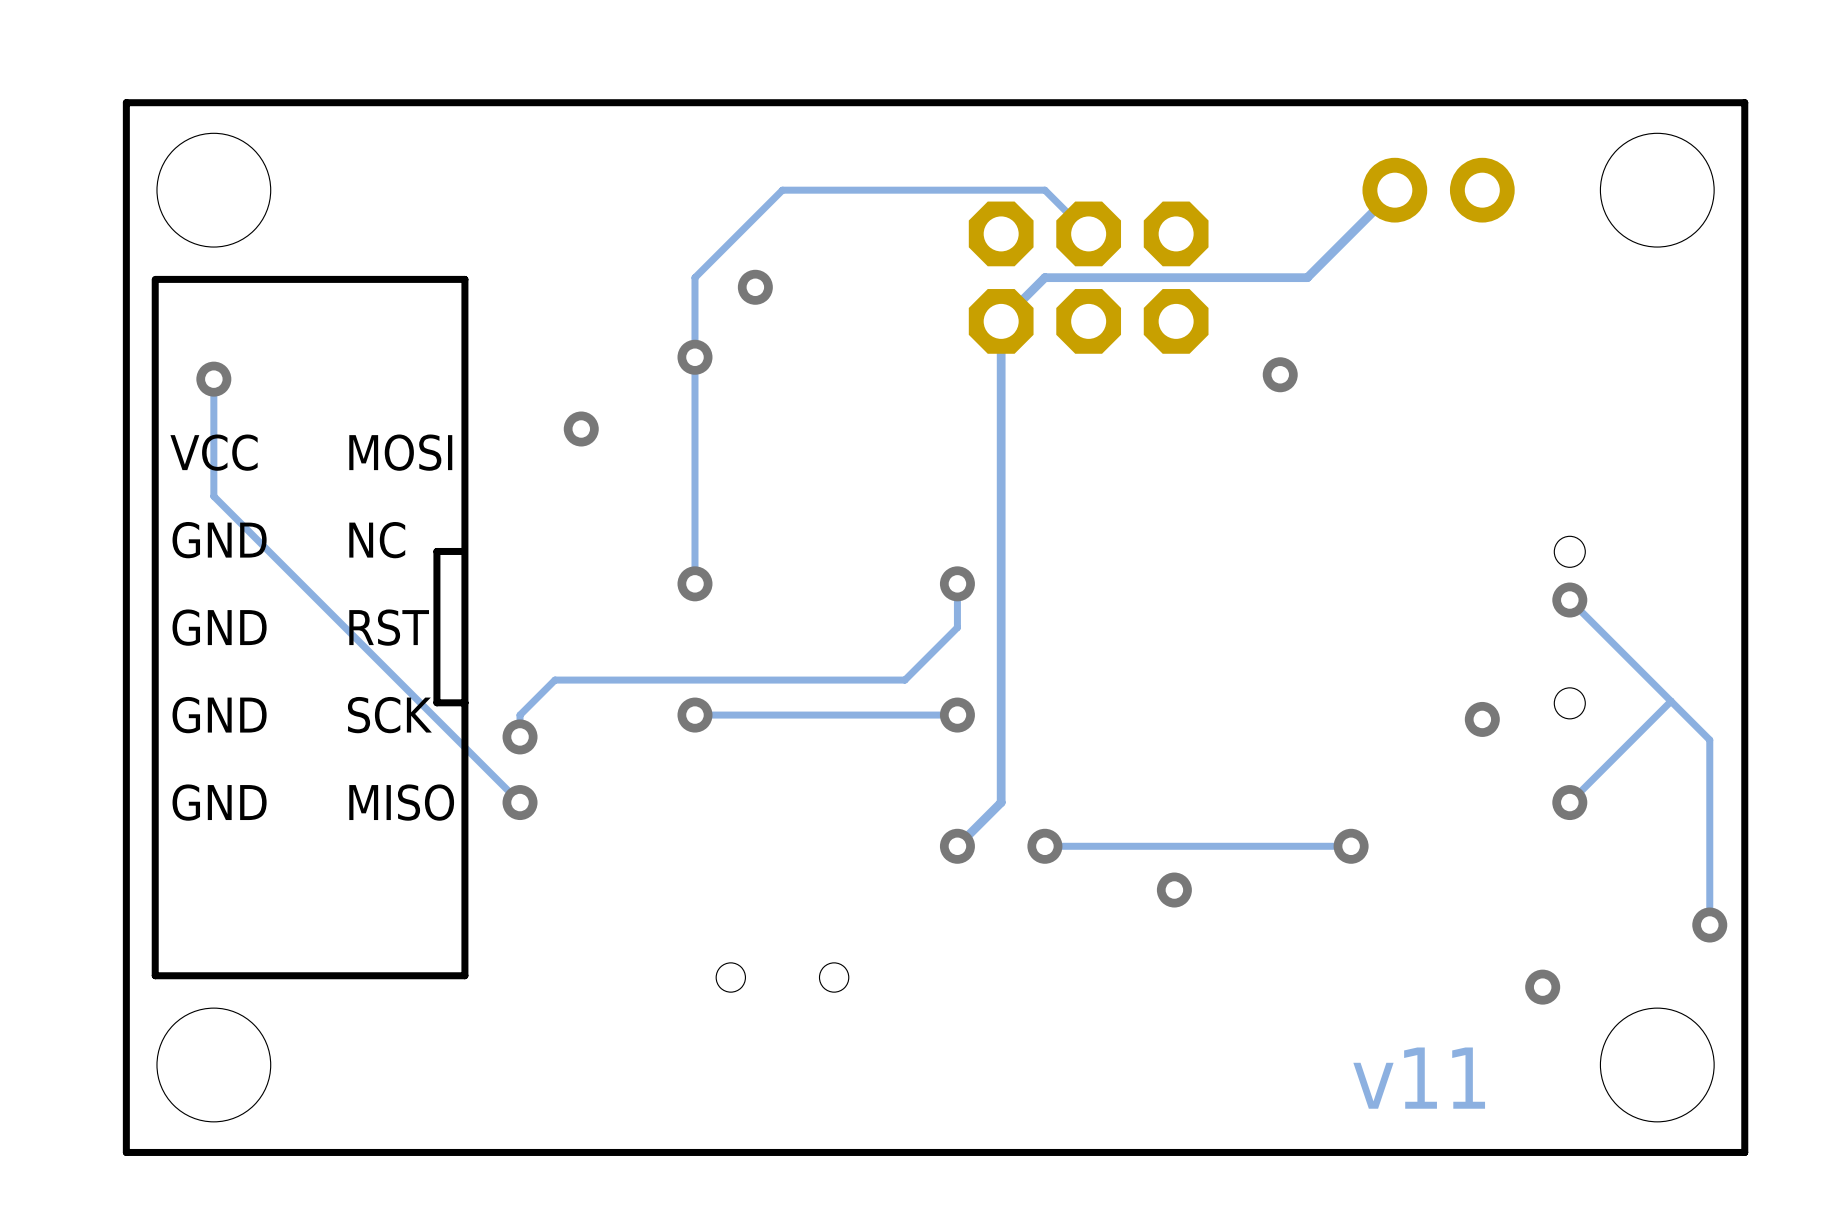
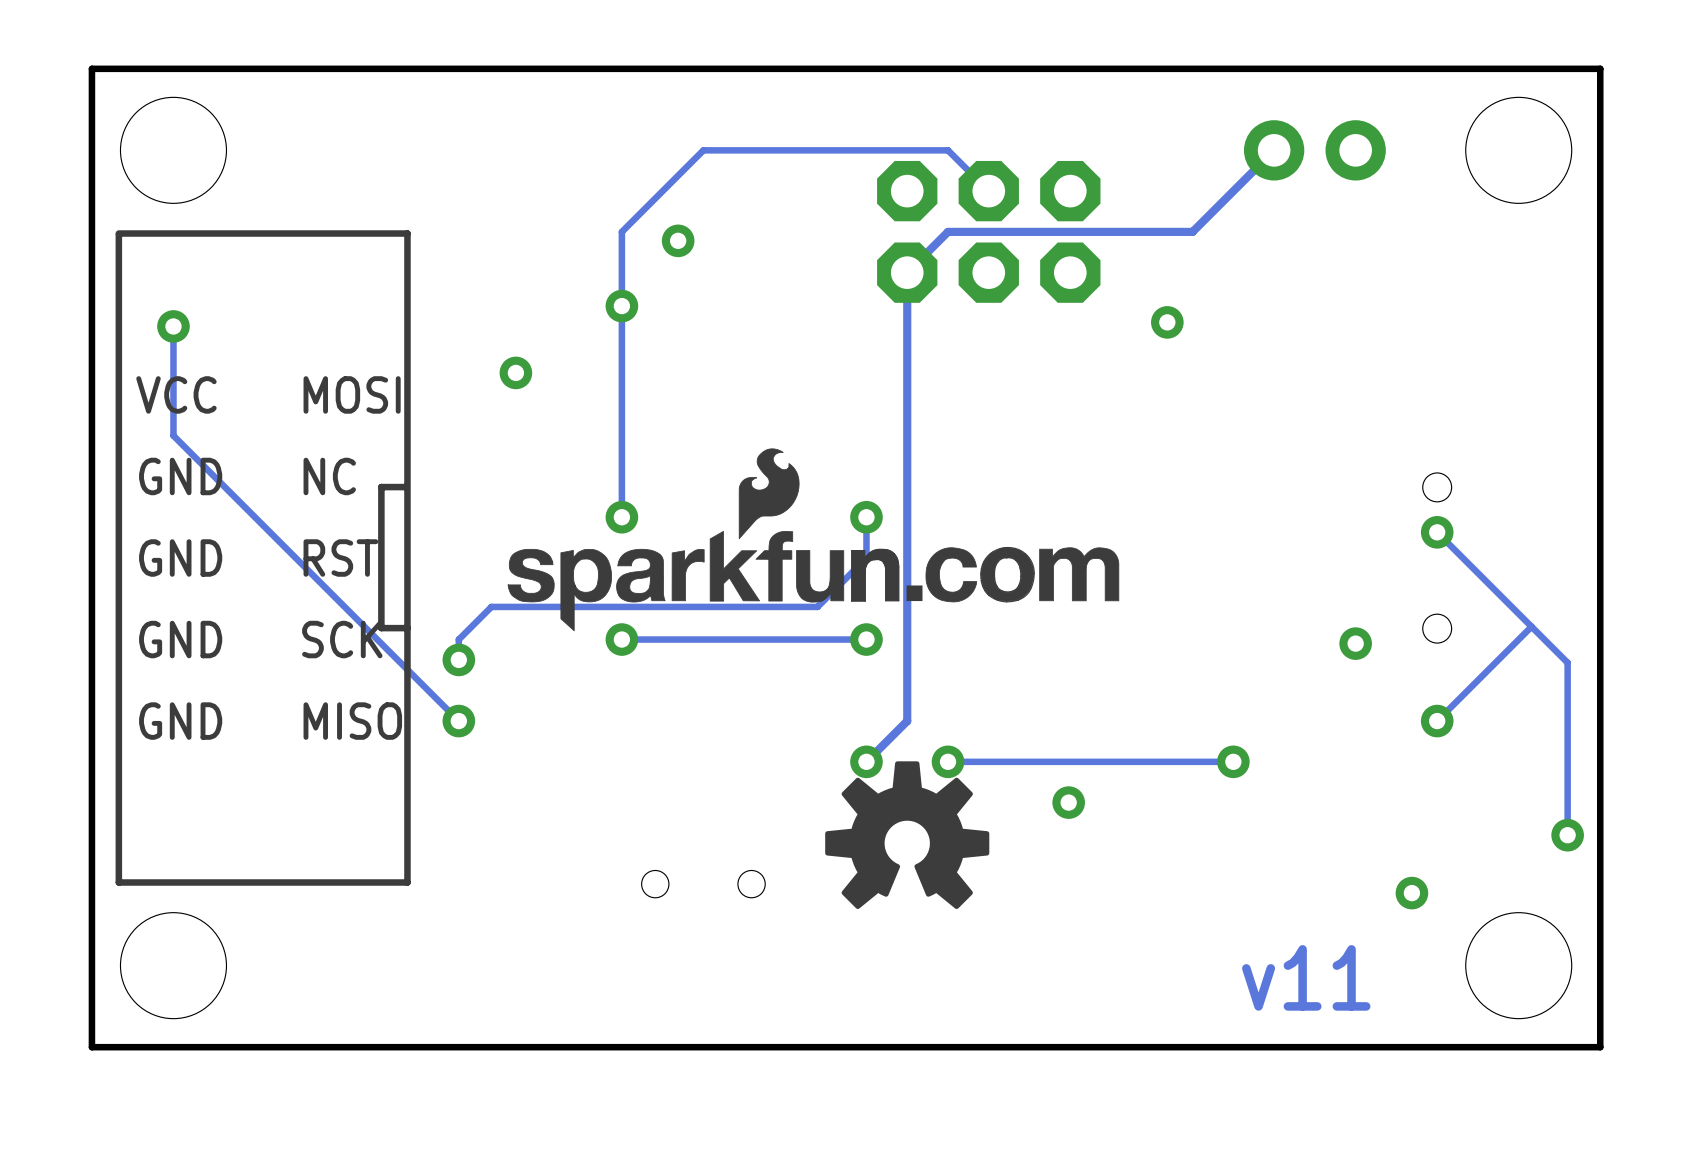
drawing: none -> [507, 448, 1120, 632]
drawing: none -> [825, 761, 990, 910]

